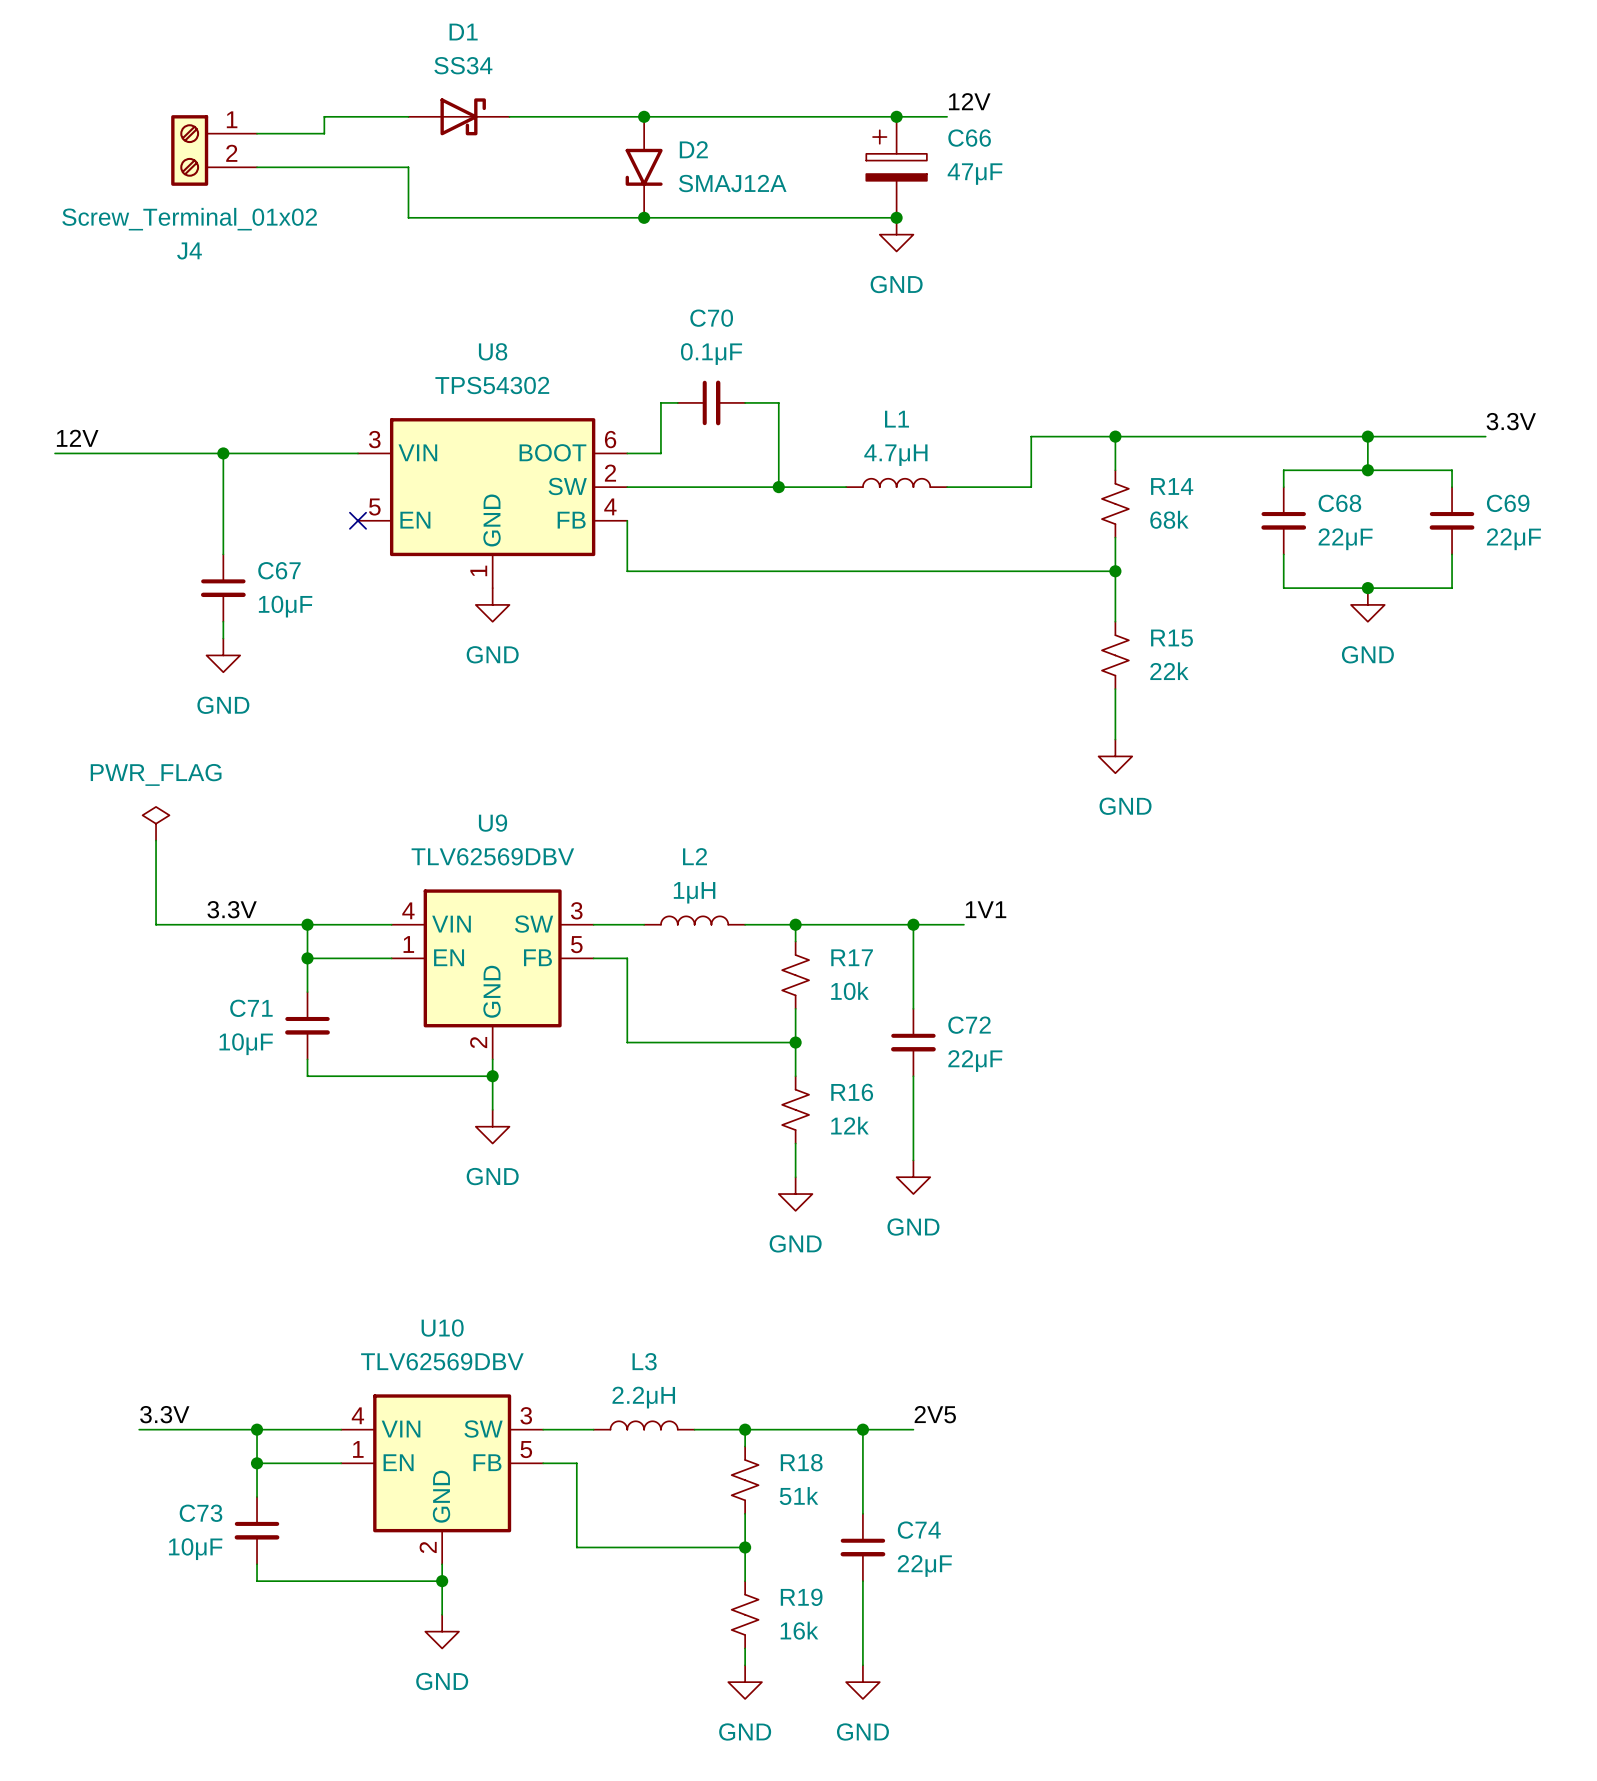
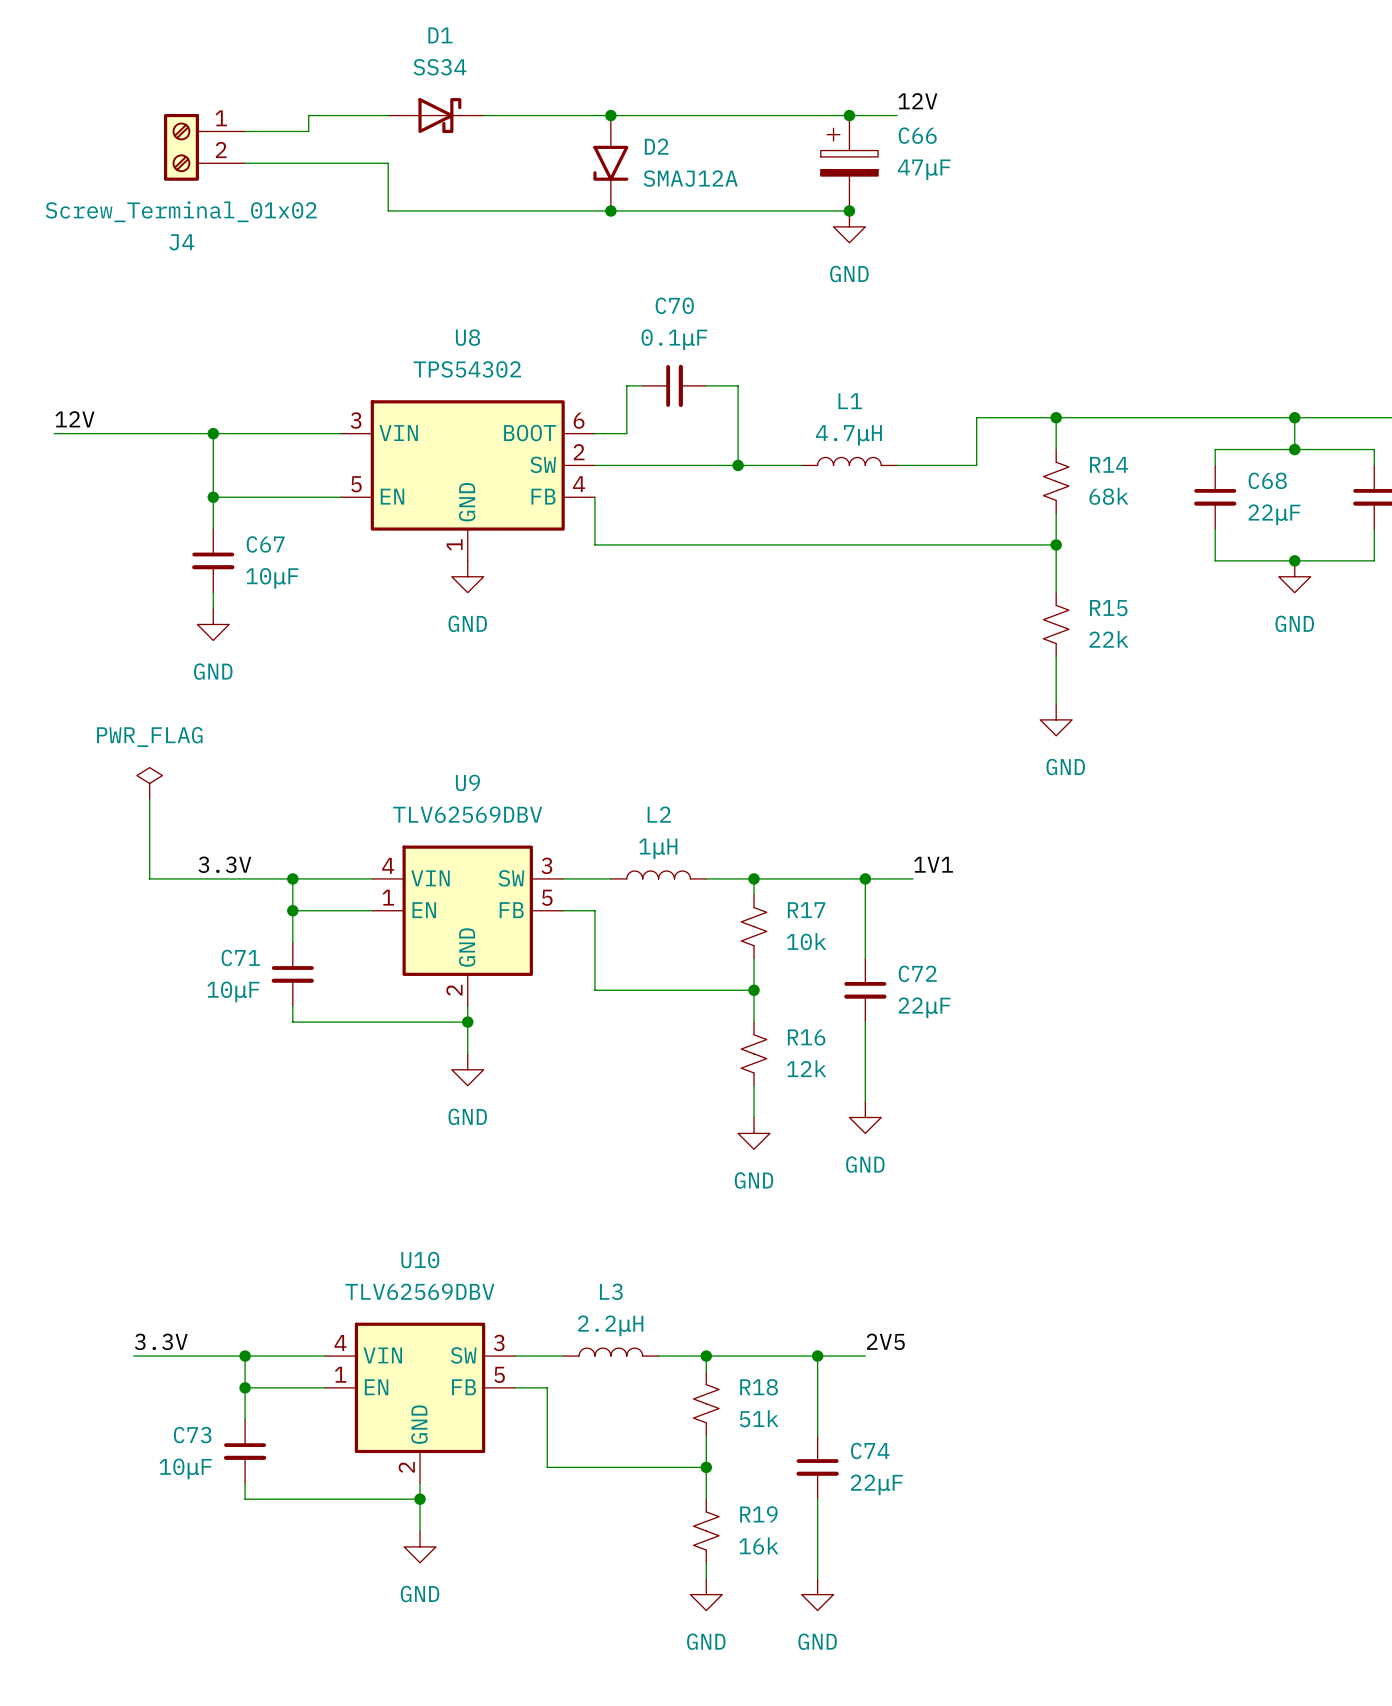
wire: none -> (213, 497) (340, 497)
junction: none -> (213, 497)
no-connect mark: (358, 520) -> none

